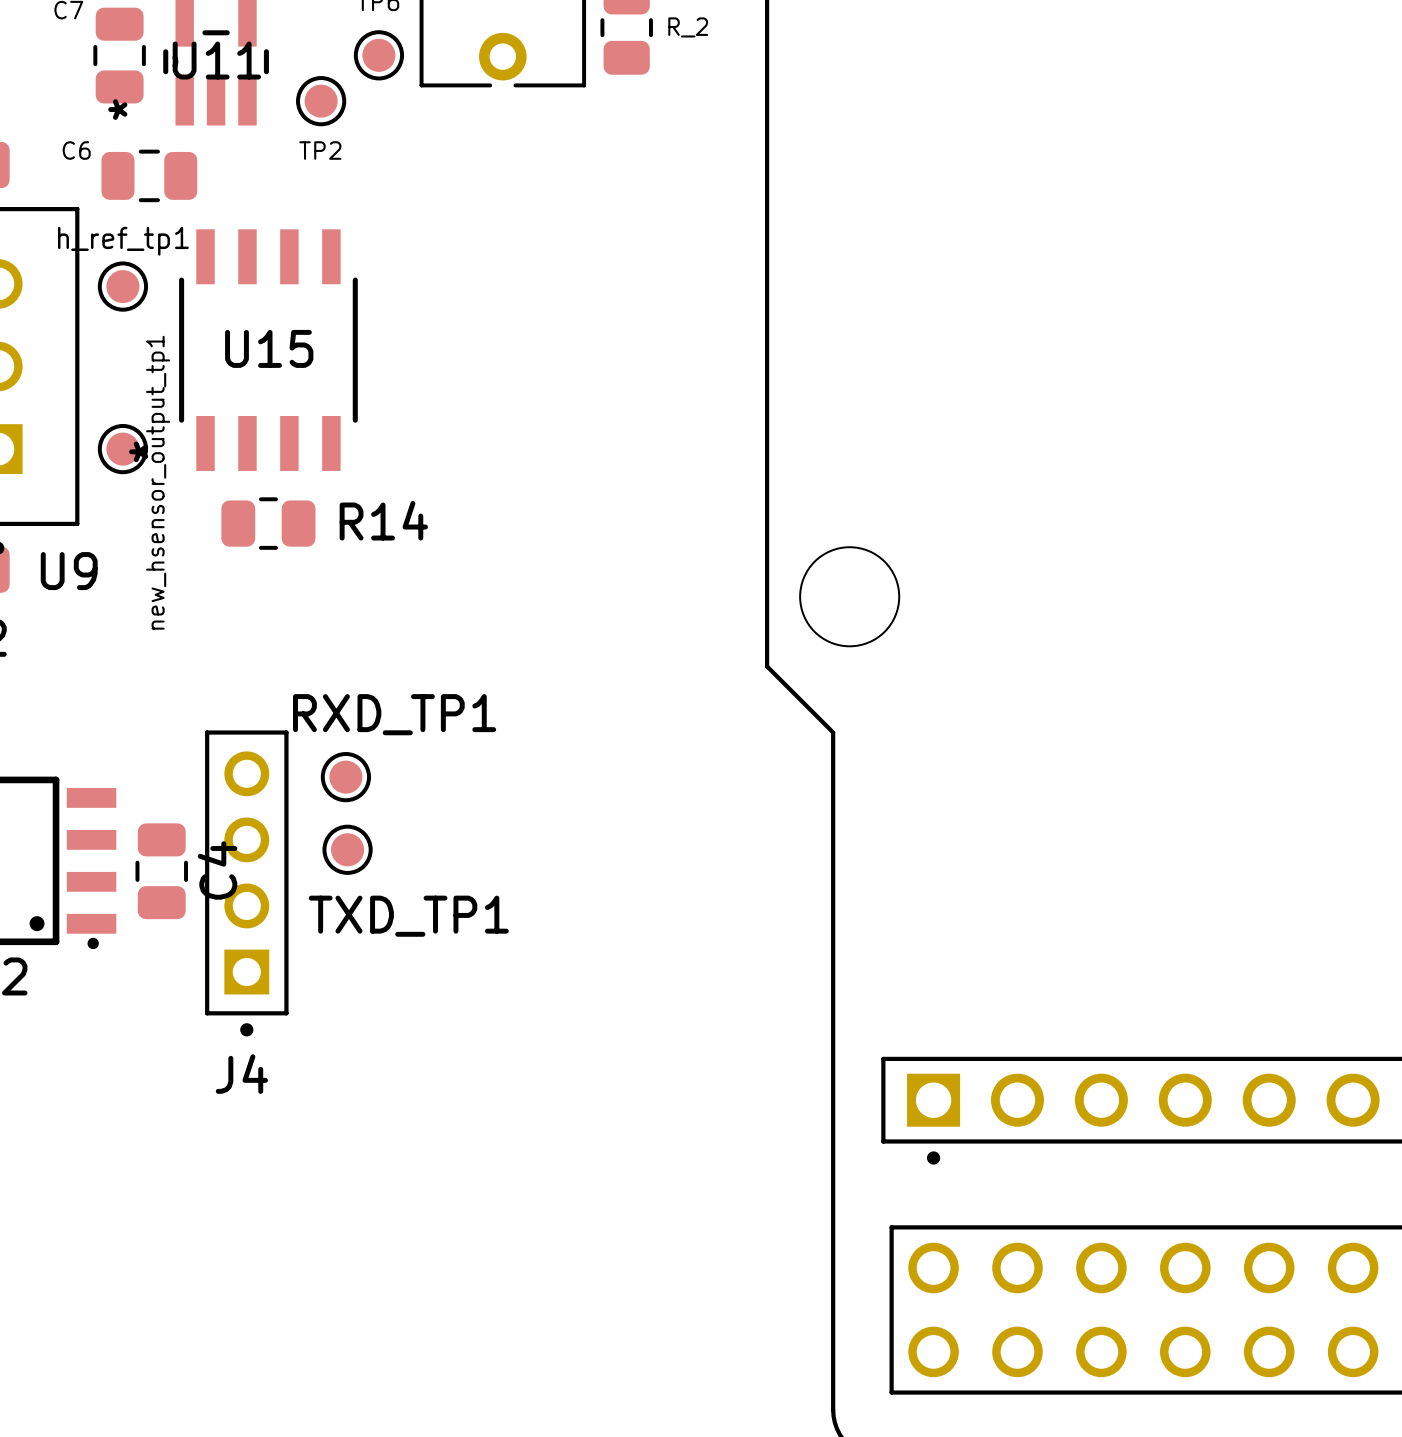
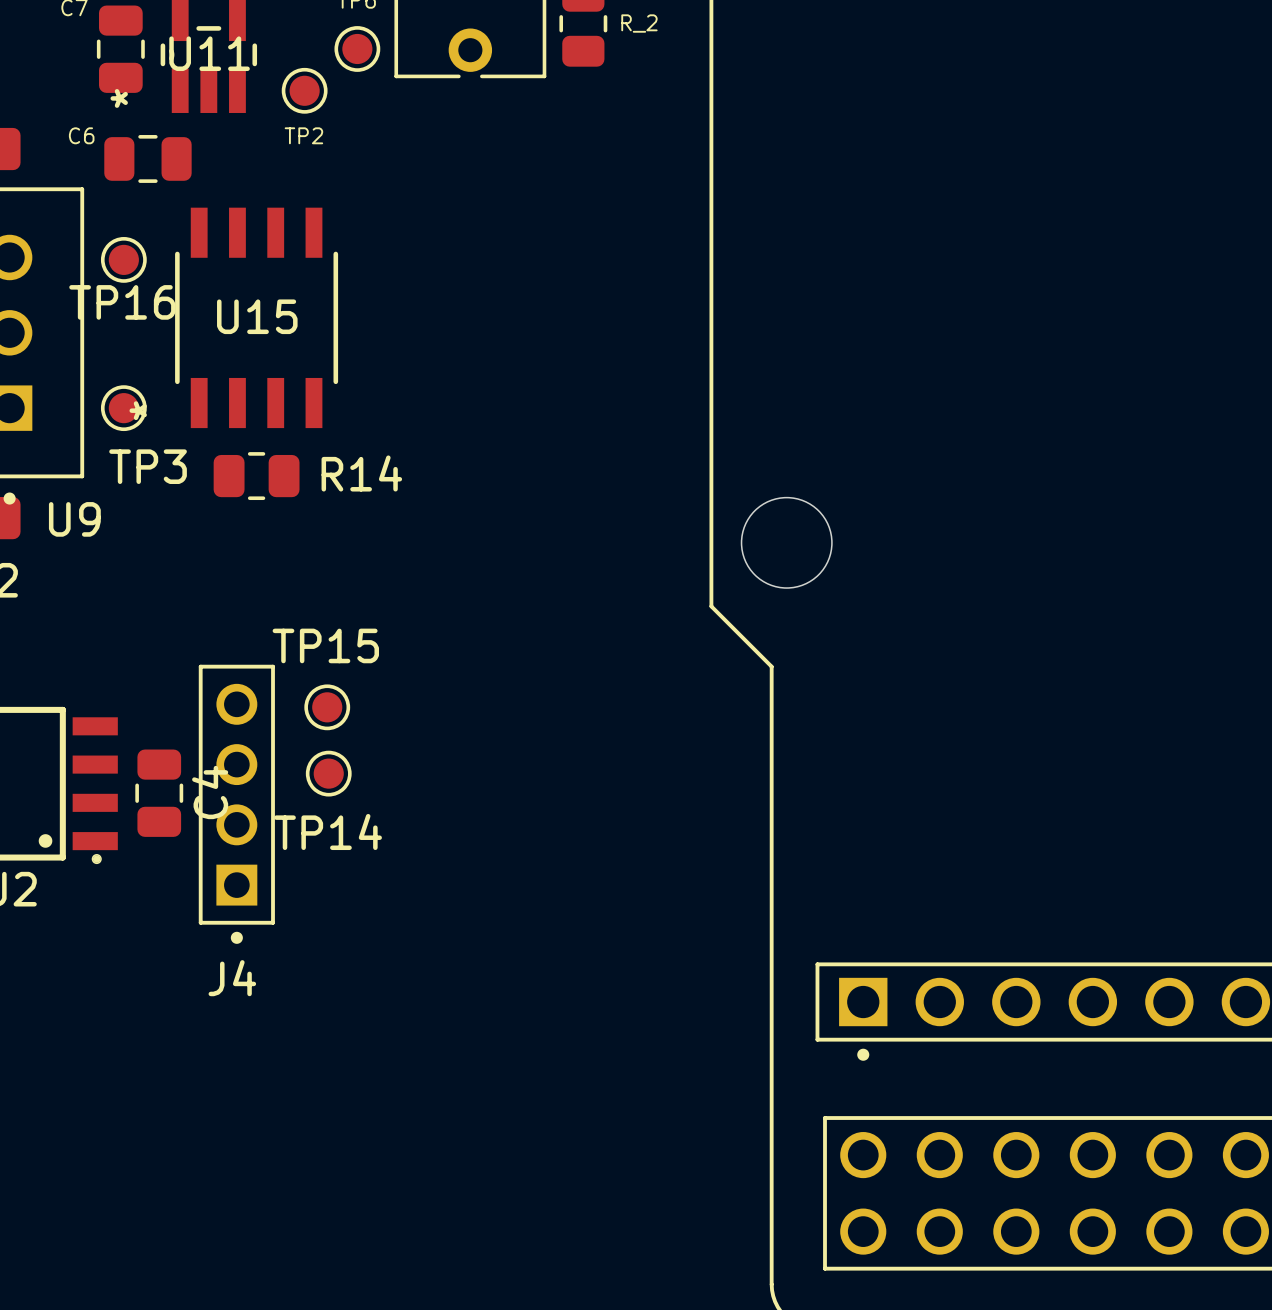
h_ref_tp1 name: h_ref_tp1 (123, 241) -> TP16 (122, 302)
new_hsensor_output_tp1 name: new_hsensor_output_tp1 (158, 482) -> TP3 (148, 466)
RXD_TP1 name: RXD_TP1 (394, 714) -> TP15 (325, 645)
TXD_TP1 name: TXD_TP1 (408, 916) -> TP14 (328, 831)

